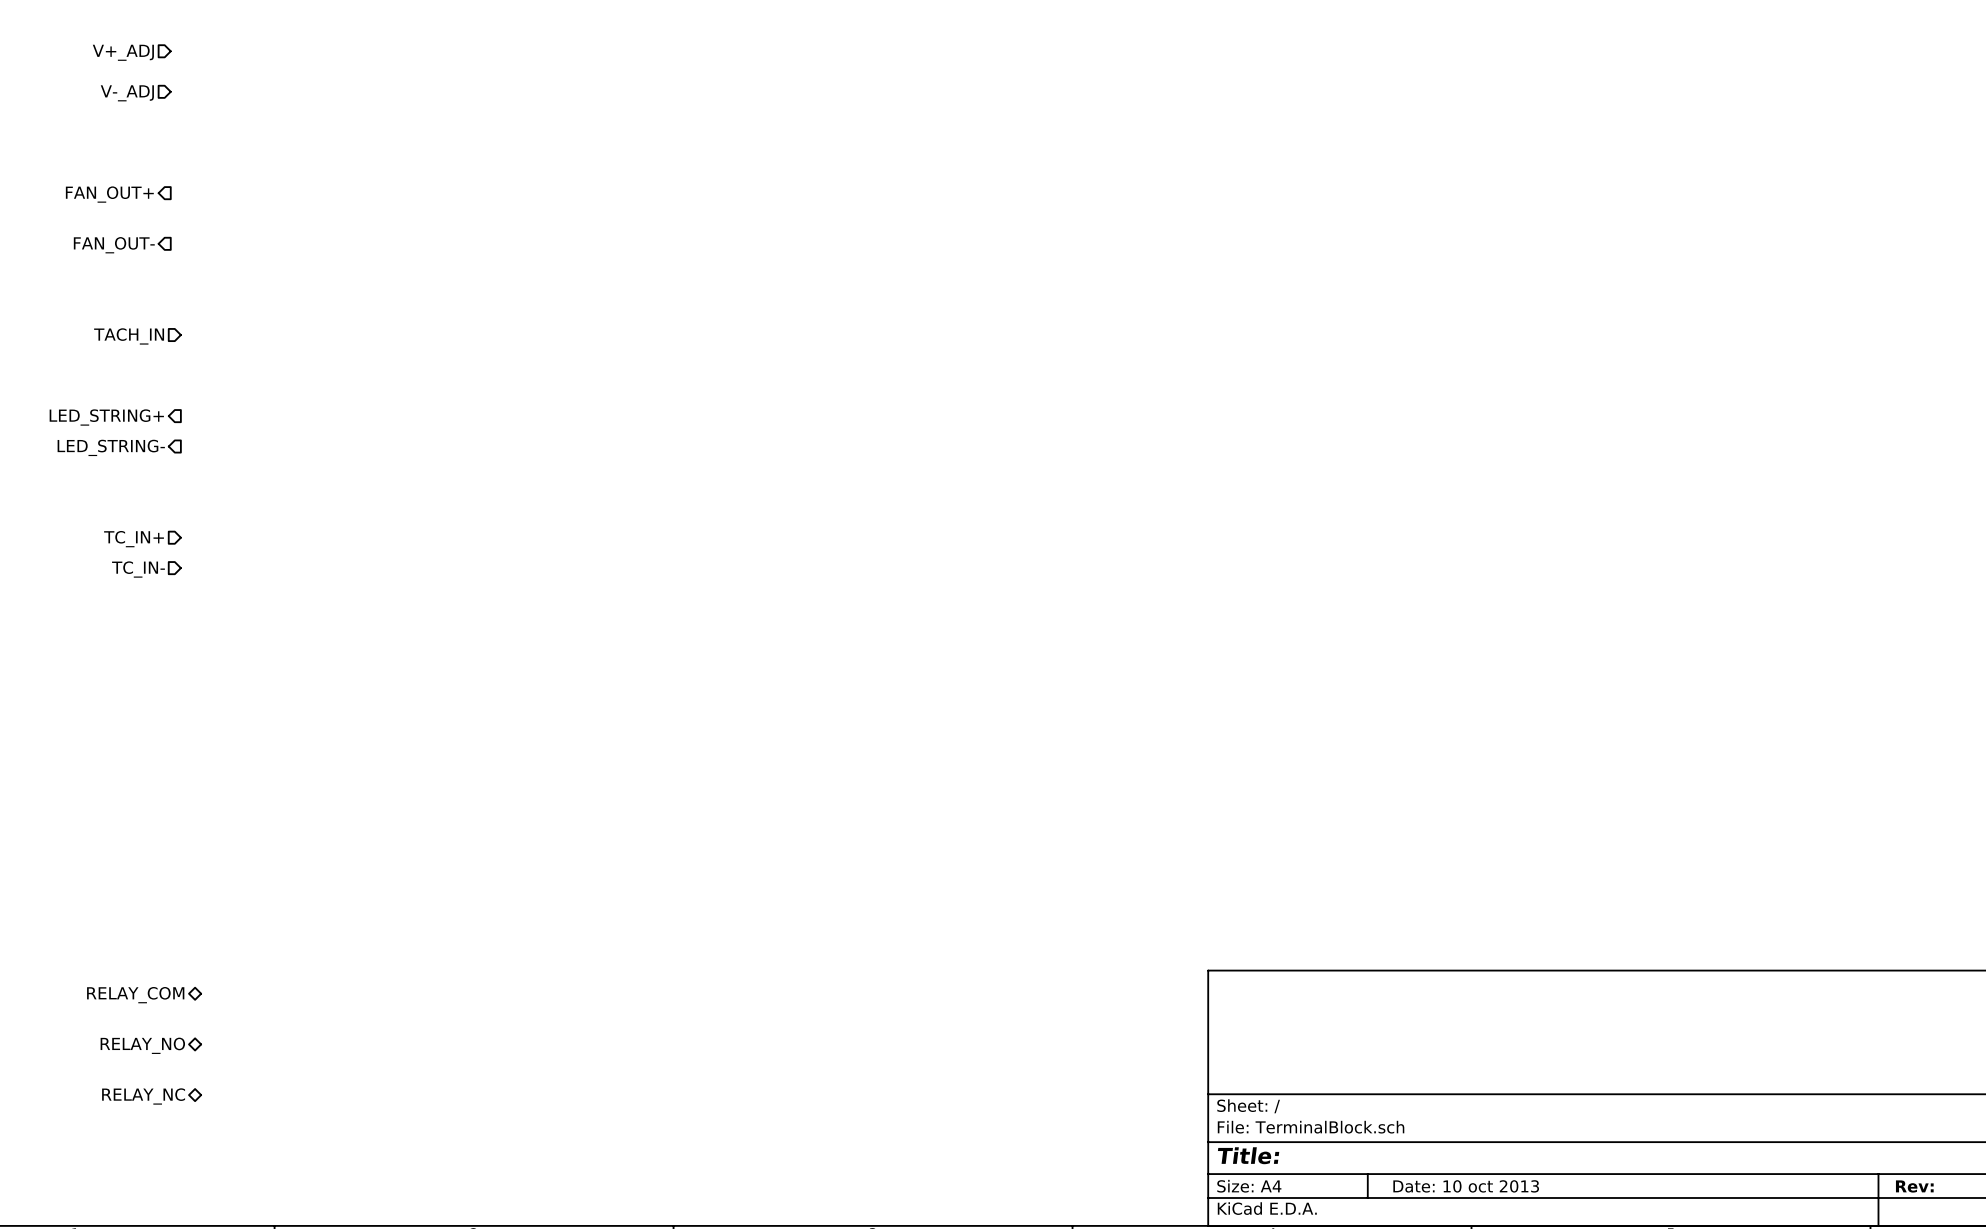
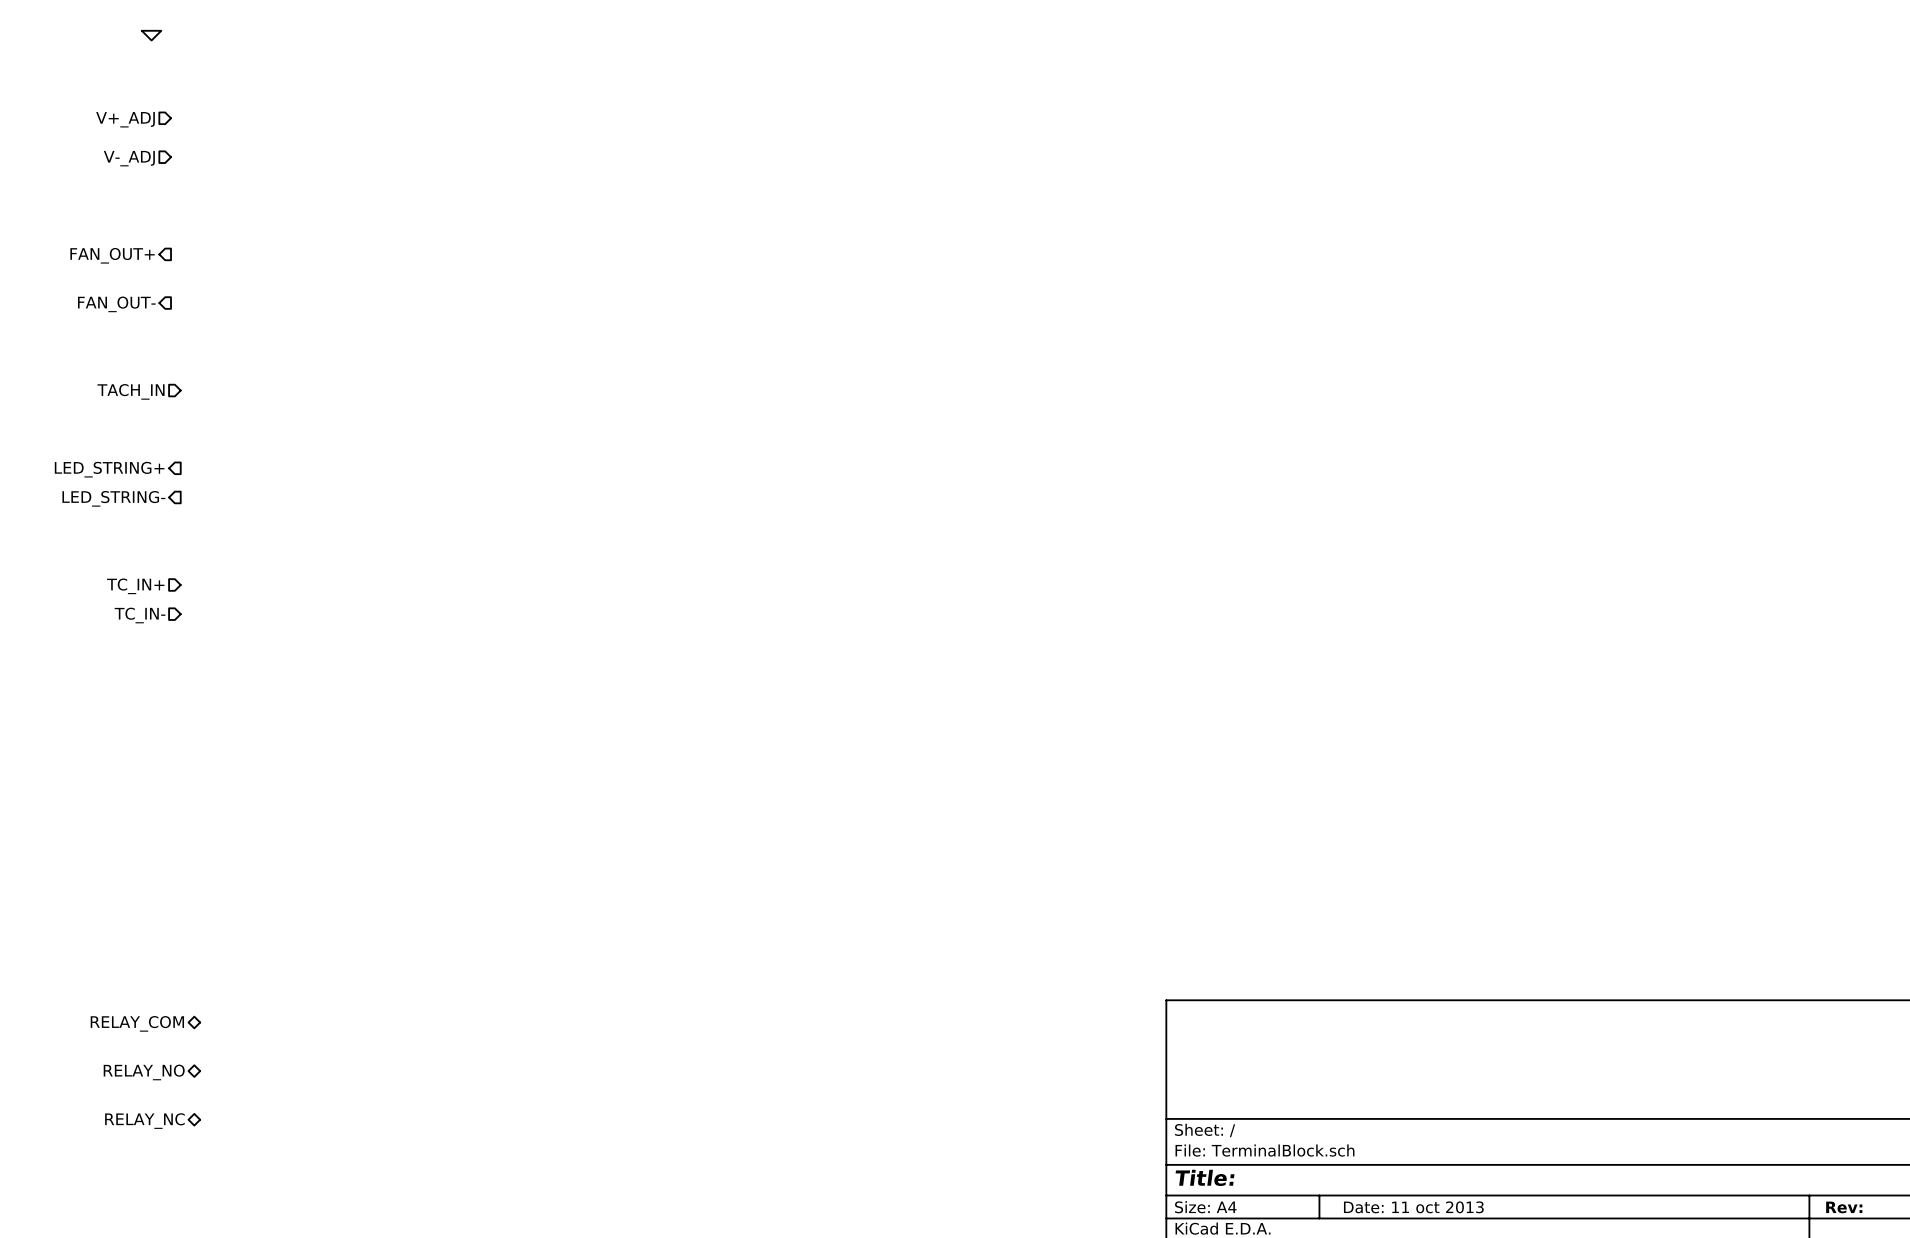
title block: Date: 10 oct 2013 (1466, 1186) -> Date: 11 oct 2013 (1413, 1207)

